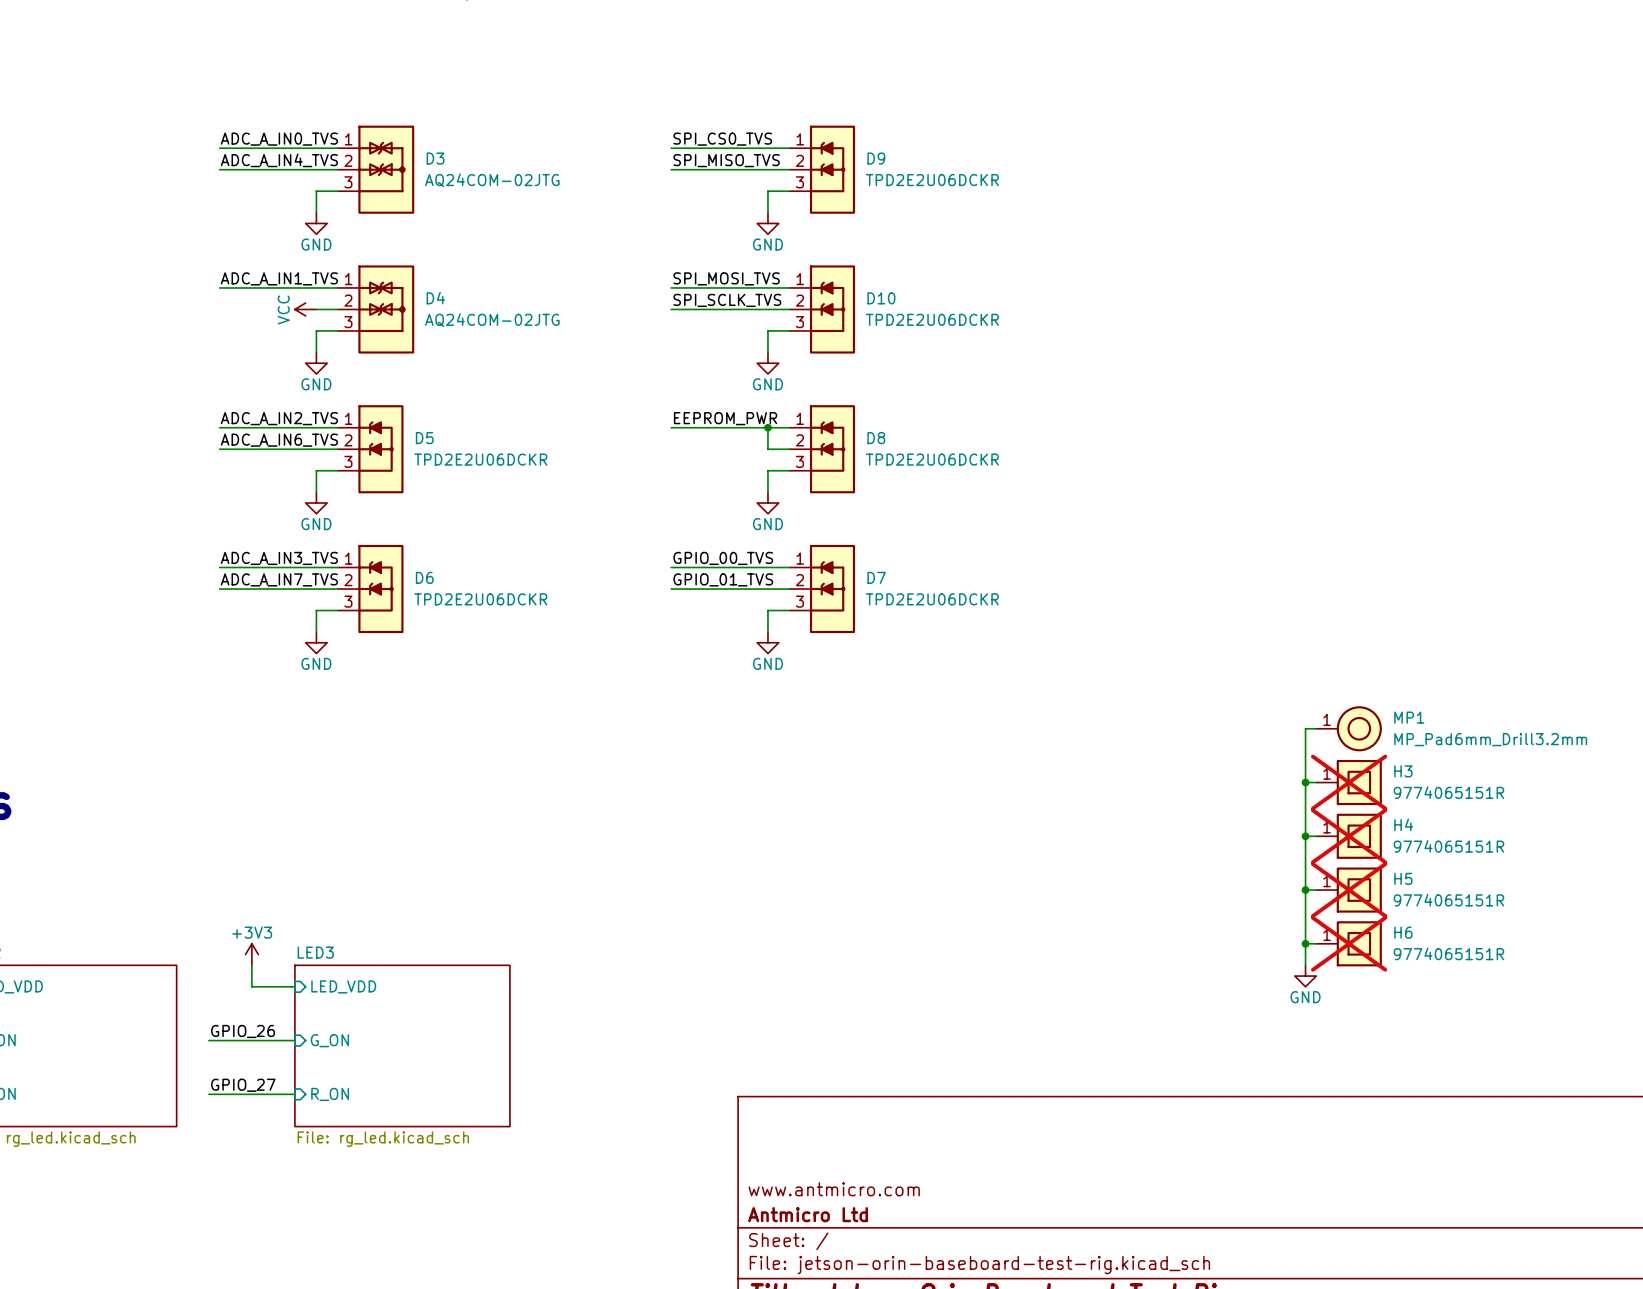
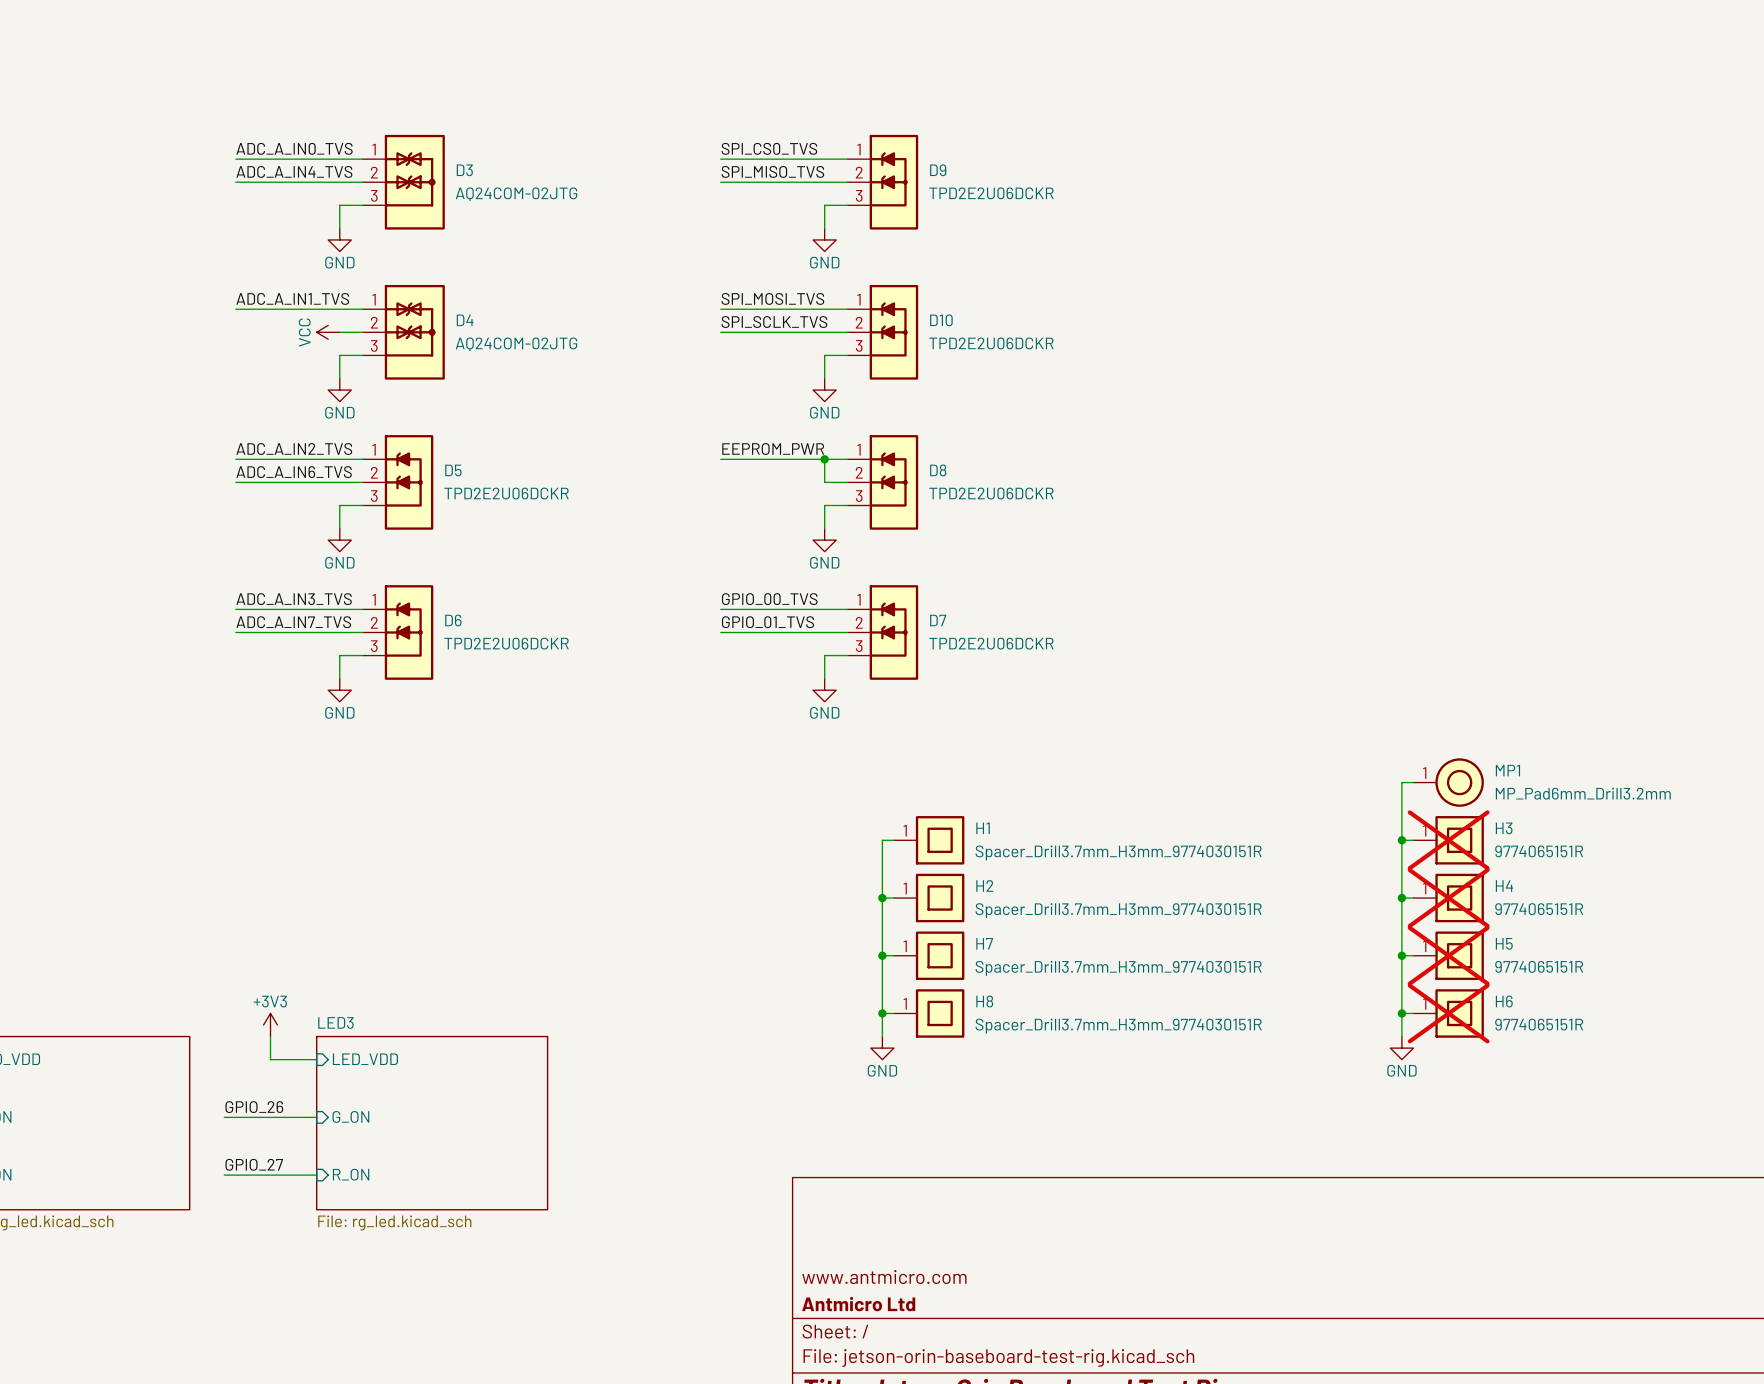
wire: none -> (893, 840) (882, 840) (882, 1036)
H1: none -> Spacer_Drill3.7mm_H3mm_9774030151R (929, 840)
wire: none -> (882, 898) (893, 898)
junction: none -> (882, 898)
H2: none -> Spacer_Drill3.7mm_H3mm_9774030151R (929, 898)
wire: none -> (882, 955) (893, 955)
junction: none -> (882, 955)
H7: none -> Spacer_Drill3.7mm_H3mm_9774030151R (929, 955)
wire: none -> (882, 1013) (893, 1013)
junction: none -> (882, 1013)
H8: none -> Spacer_Drill3.7mm_H3mm_9774030151R (929, 1013)
power symbol: none -> GND (882, 1048)

